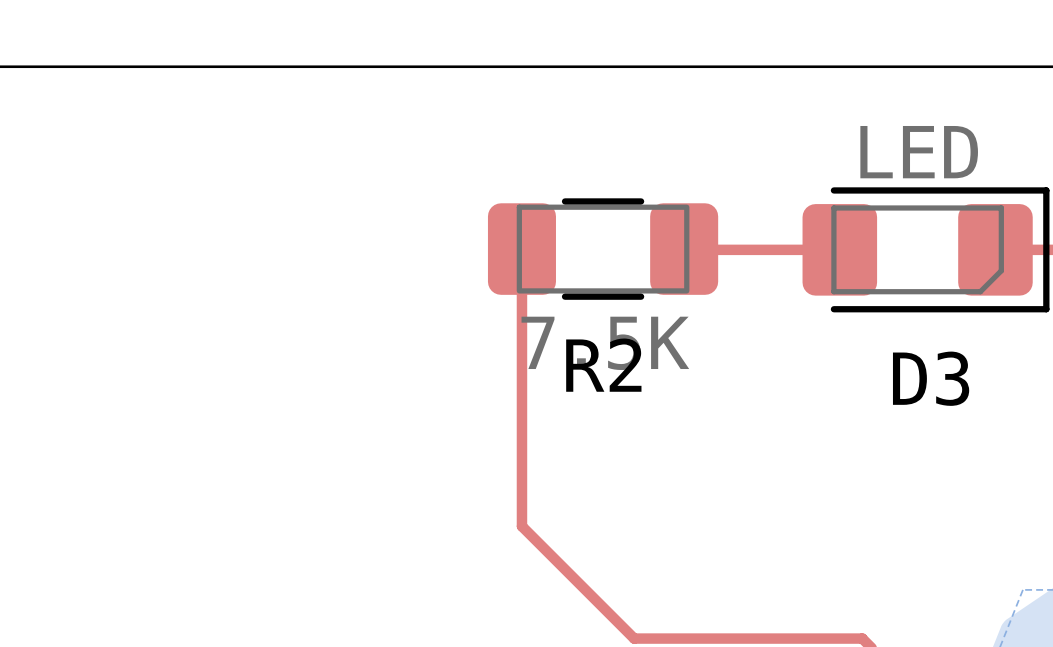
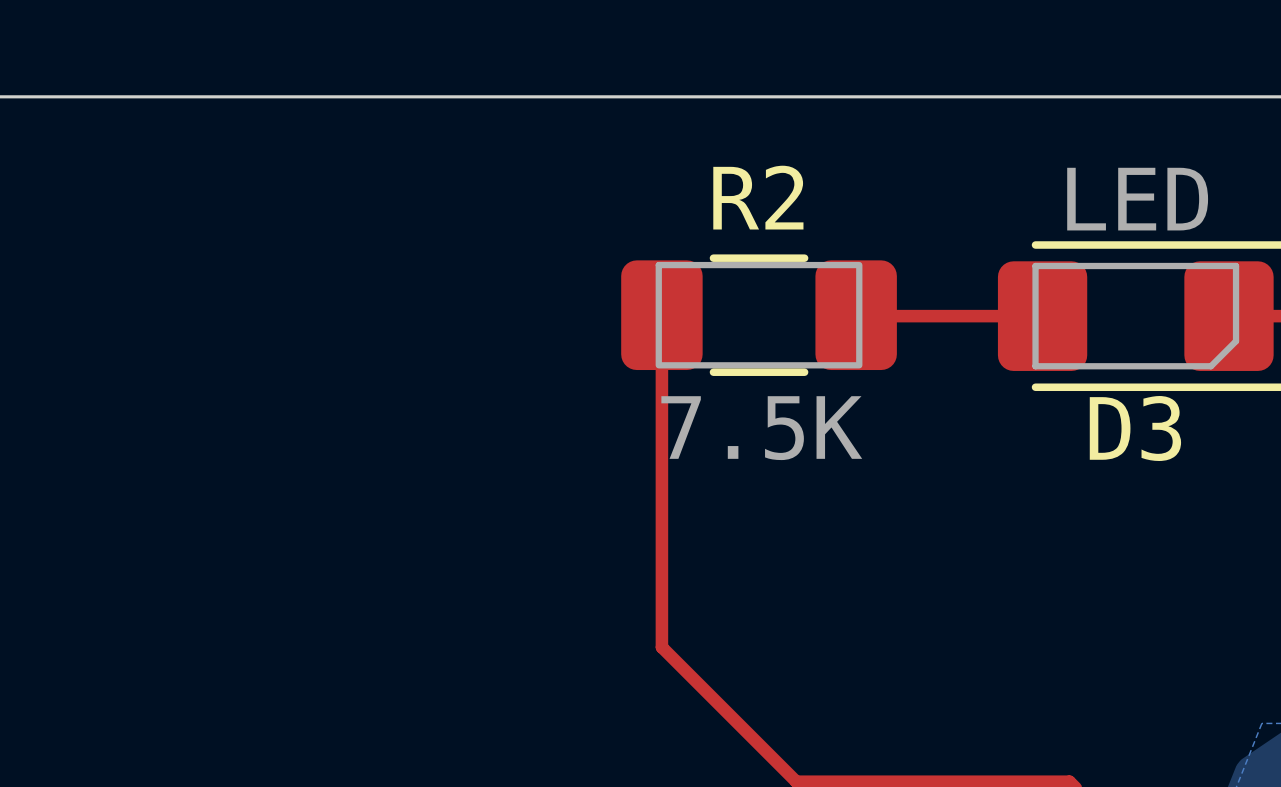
R2 name position: R2 (603, 365) -> R2 (758, 197)
D3 name position: D3 (931, 378) -> D3 (1135, 428)

